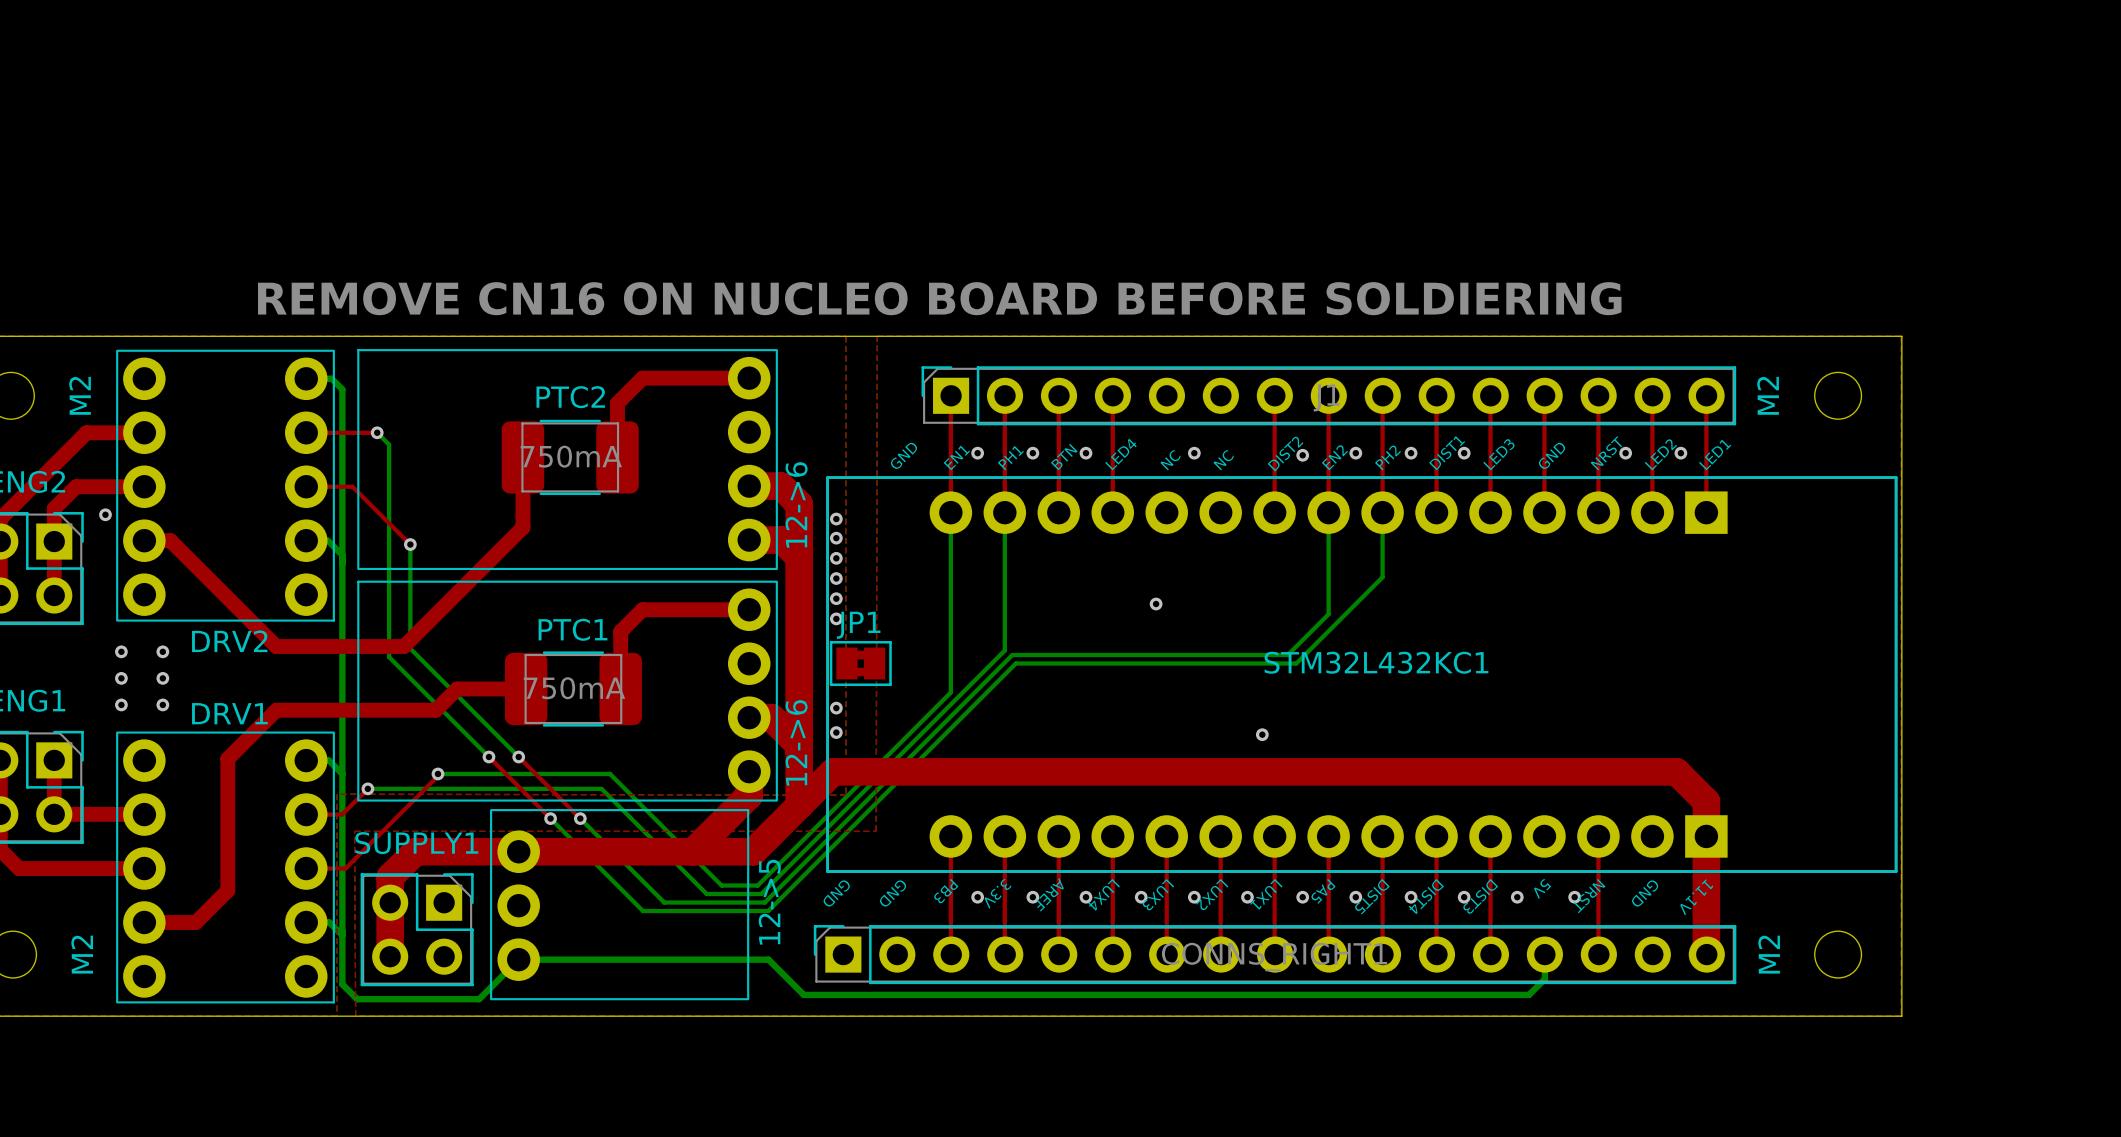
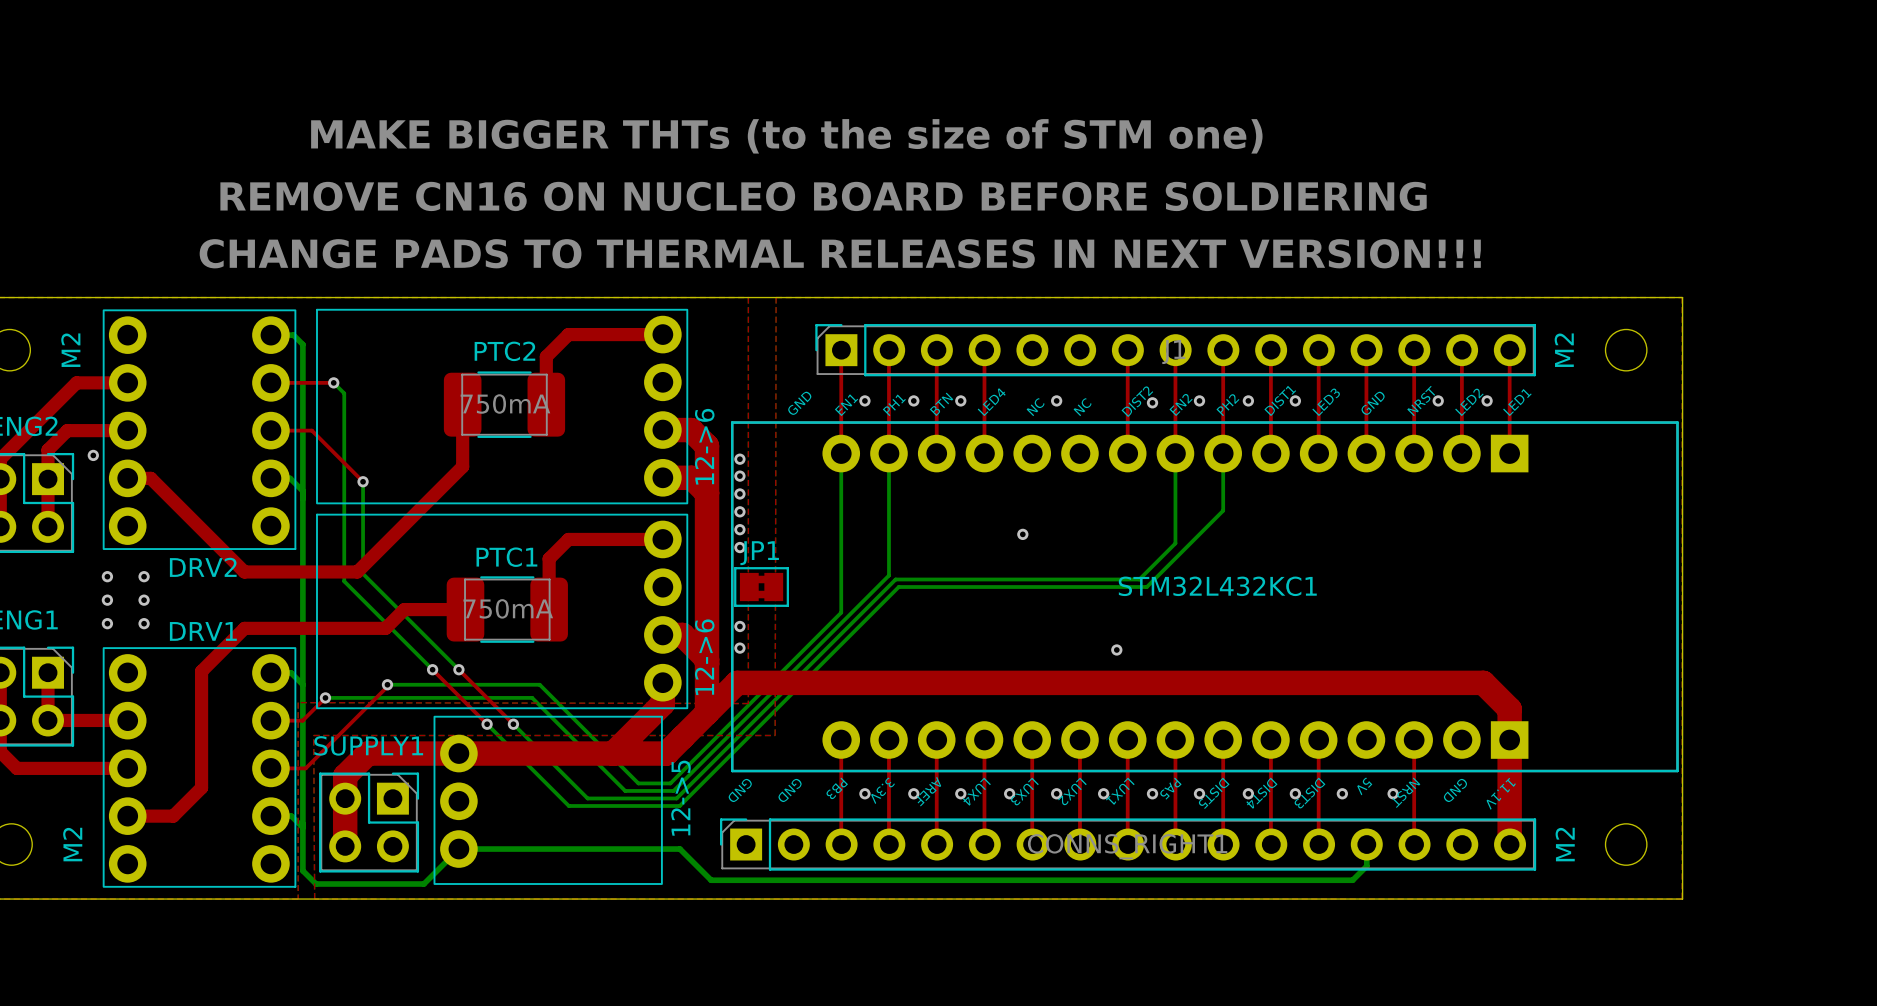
text: none -> MAKE BIGGER THTs (to the size of STM one) (786, 136)
text: none -> CHANGE PADS TO THERMAL RELEASES IN NEXT VERSION!!! (840, 253)
text position: REMOVE CN16 ON NUCLEO BOARD BEFORE SOLDIERING (939, 298) -> REMOVE CN16 ON NUCLEO BOARD BEFORE SOLDIERING (823, 196)

